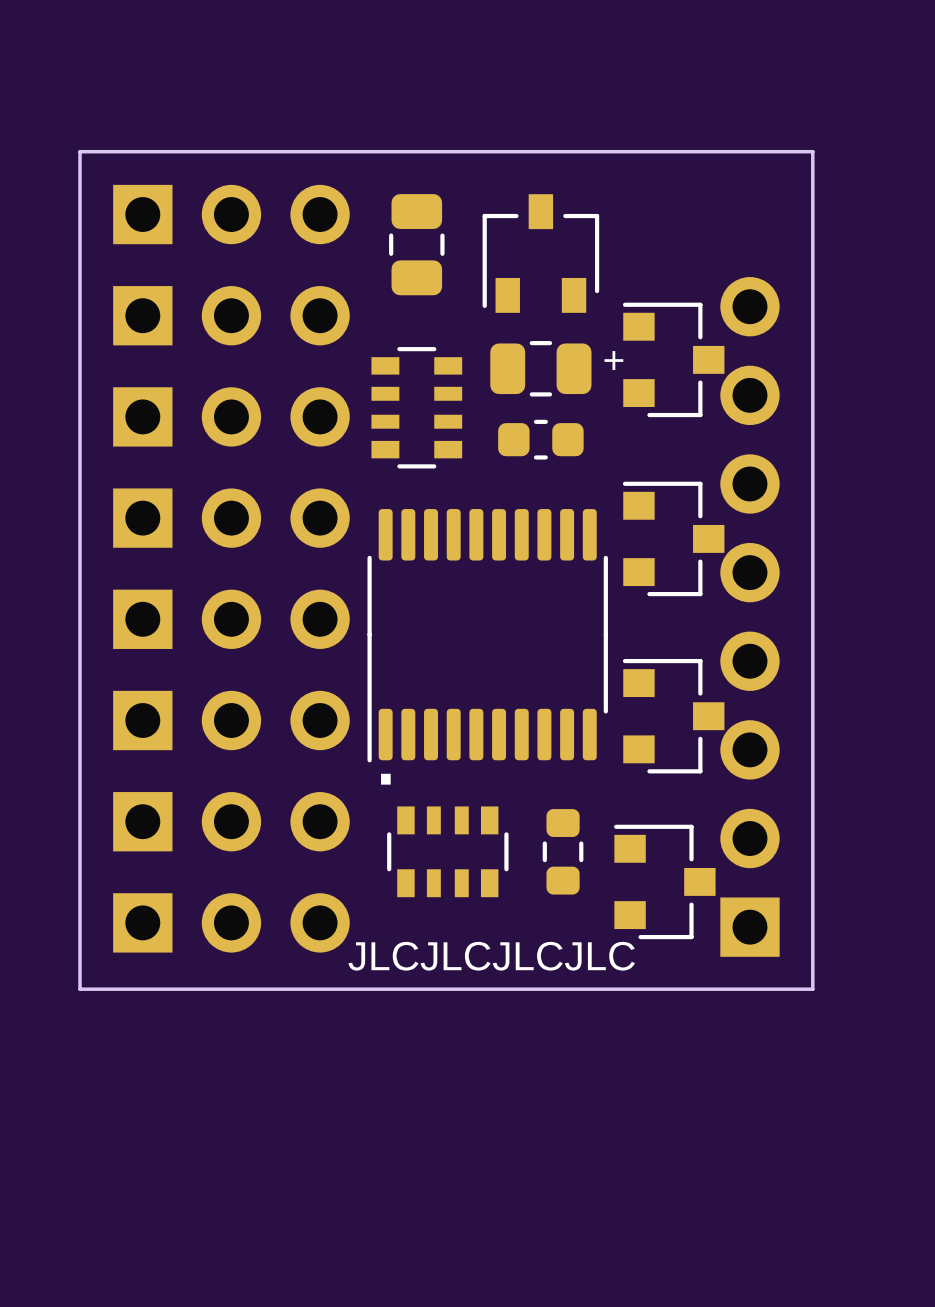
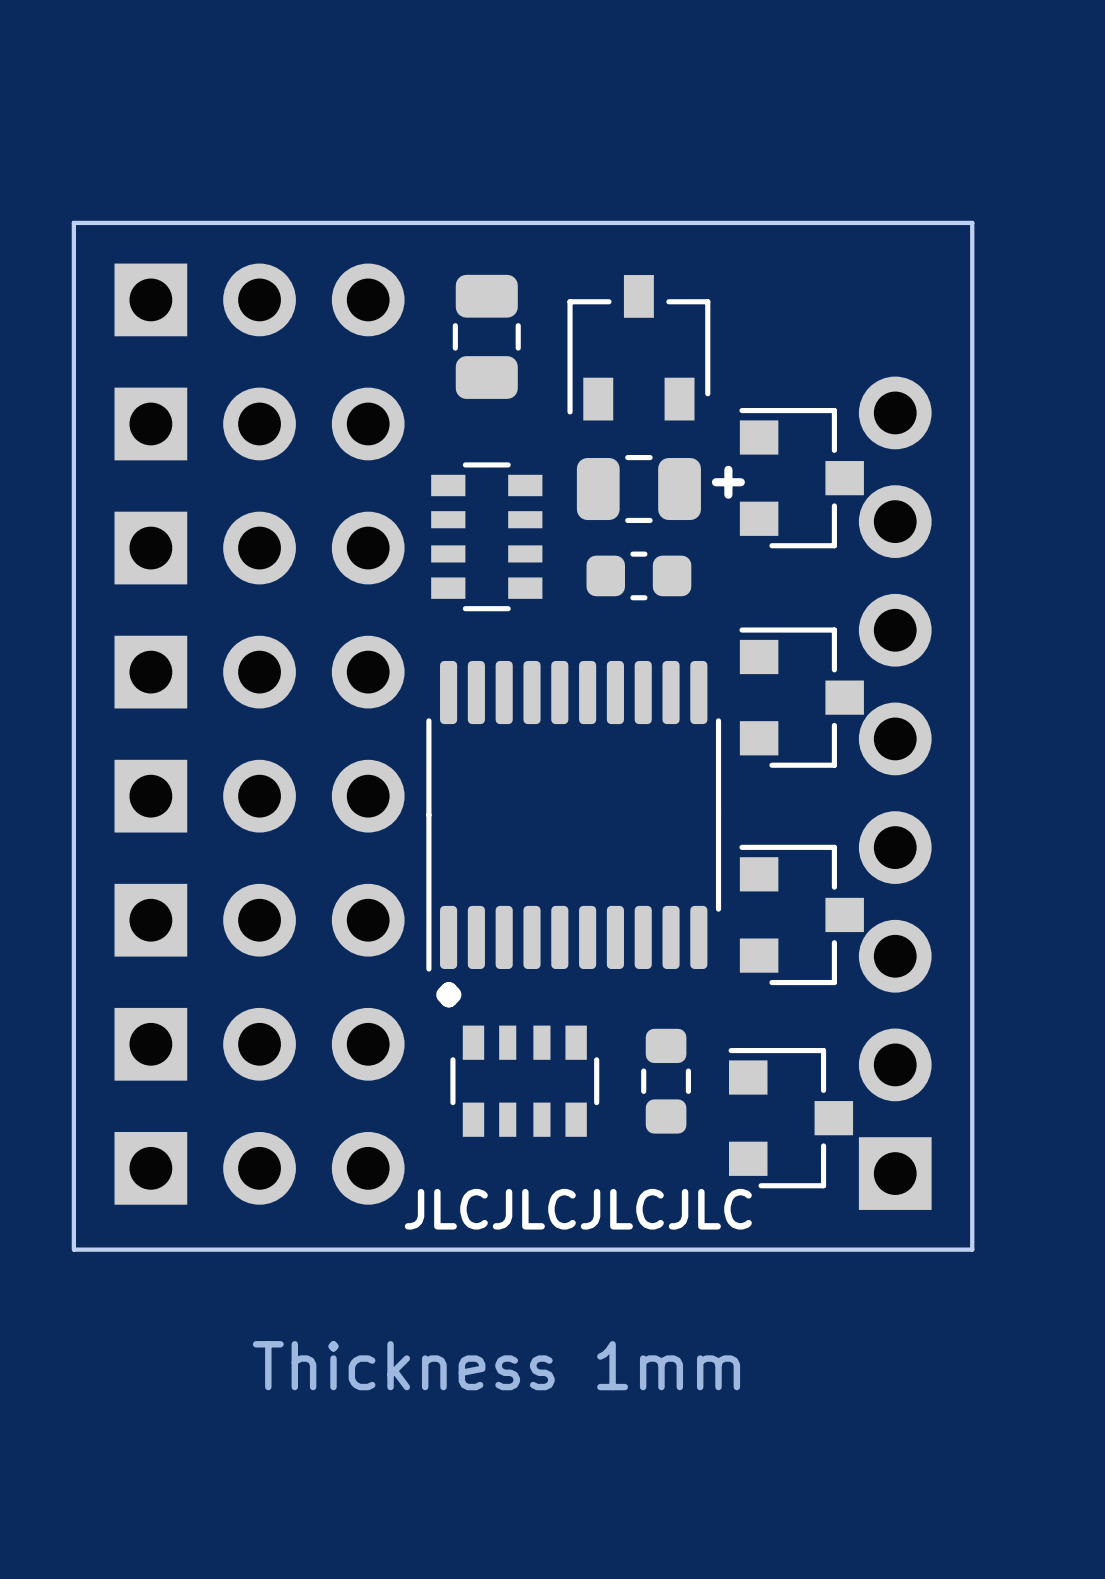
text: none -> Thickness 1mm (496, 1365)

